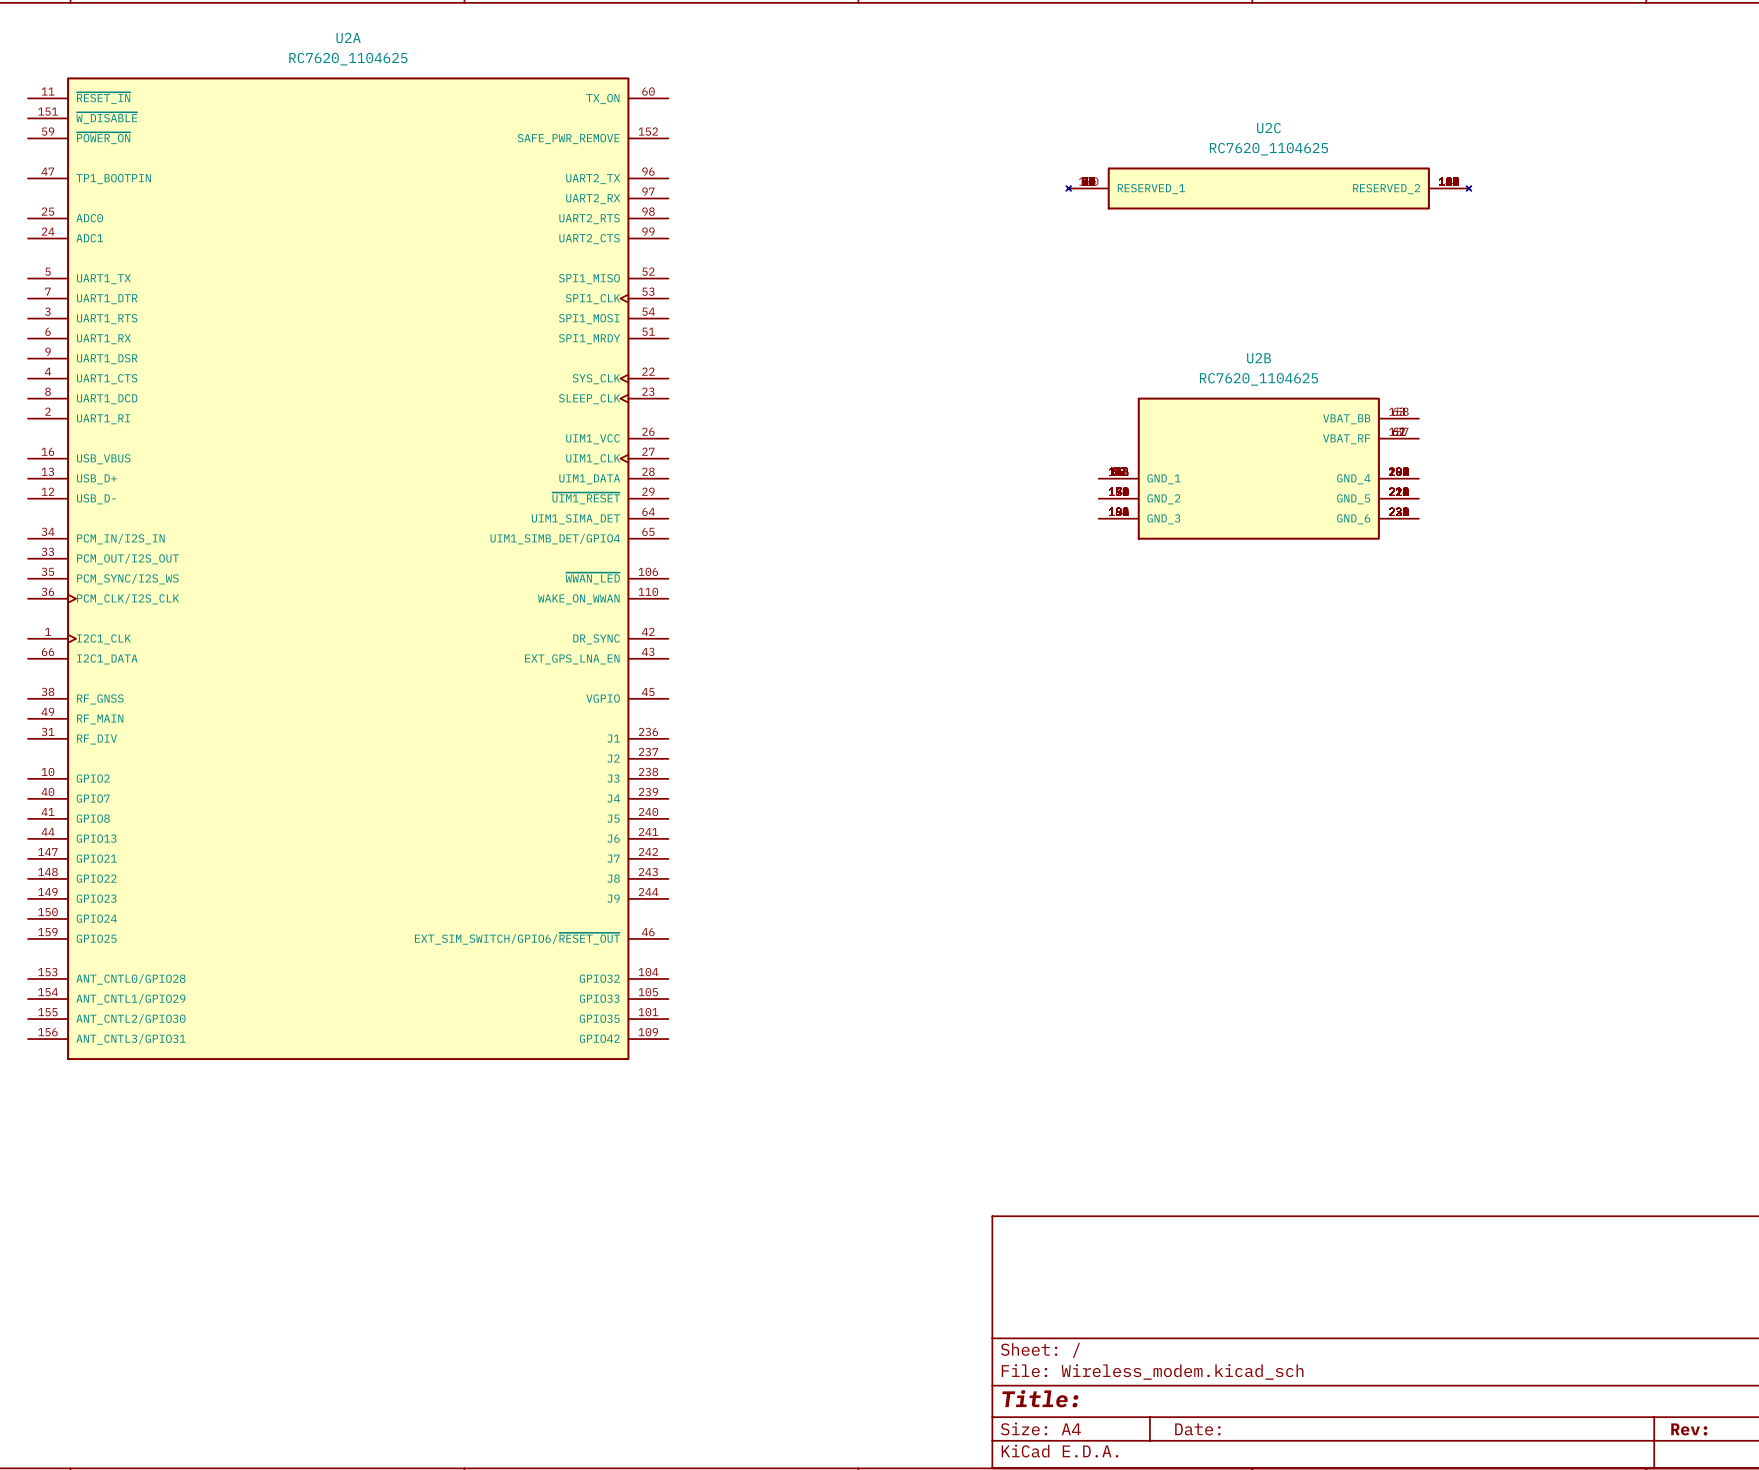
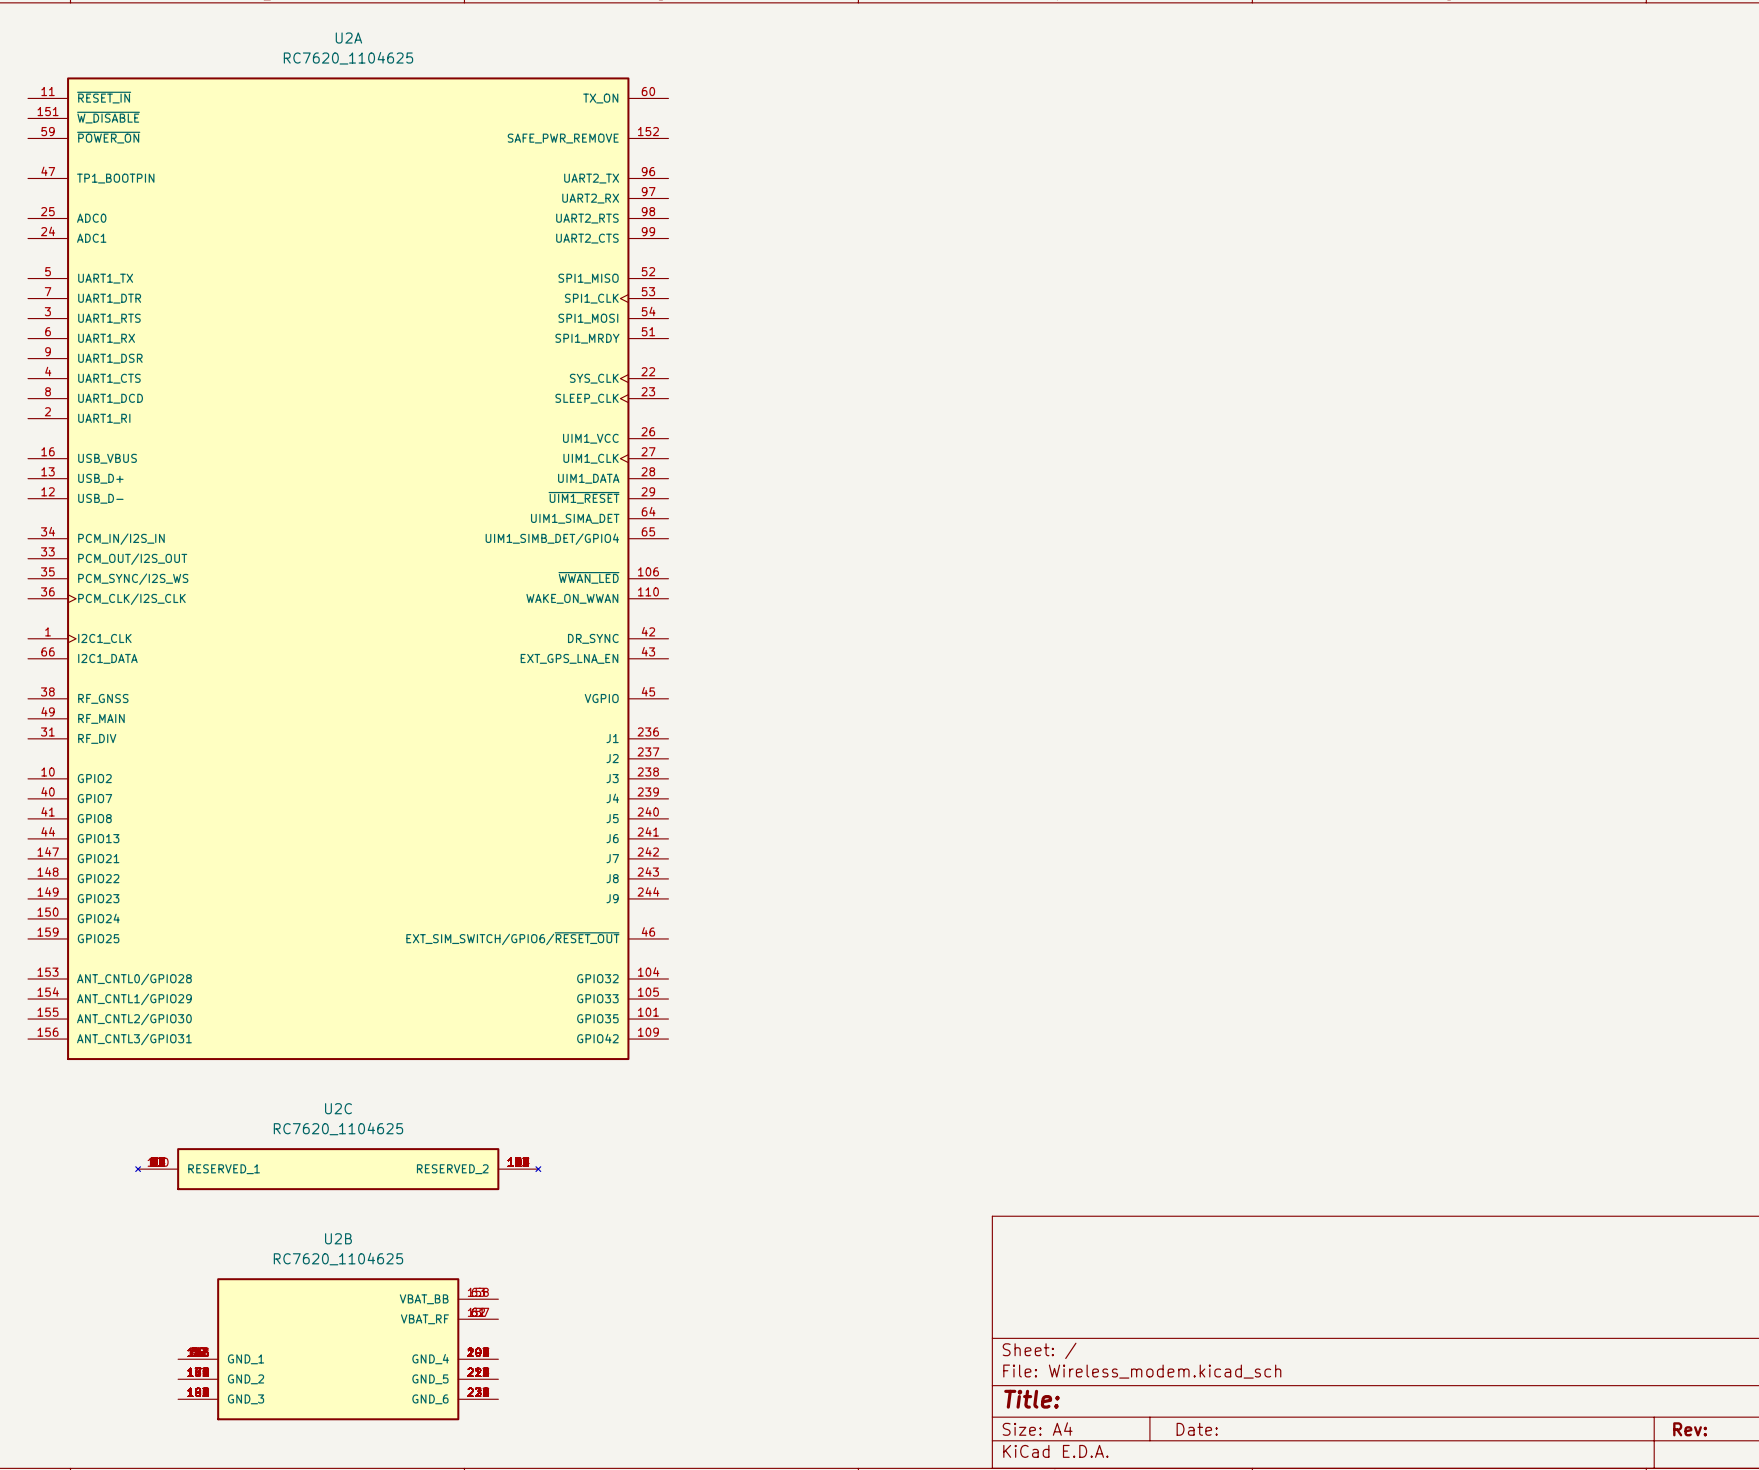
U2C position: (1268, 188) -> (338, 1169)
U2B position: (1258, 468) -> (338, 1349)

